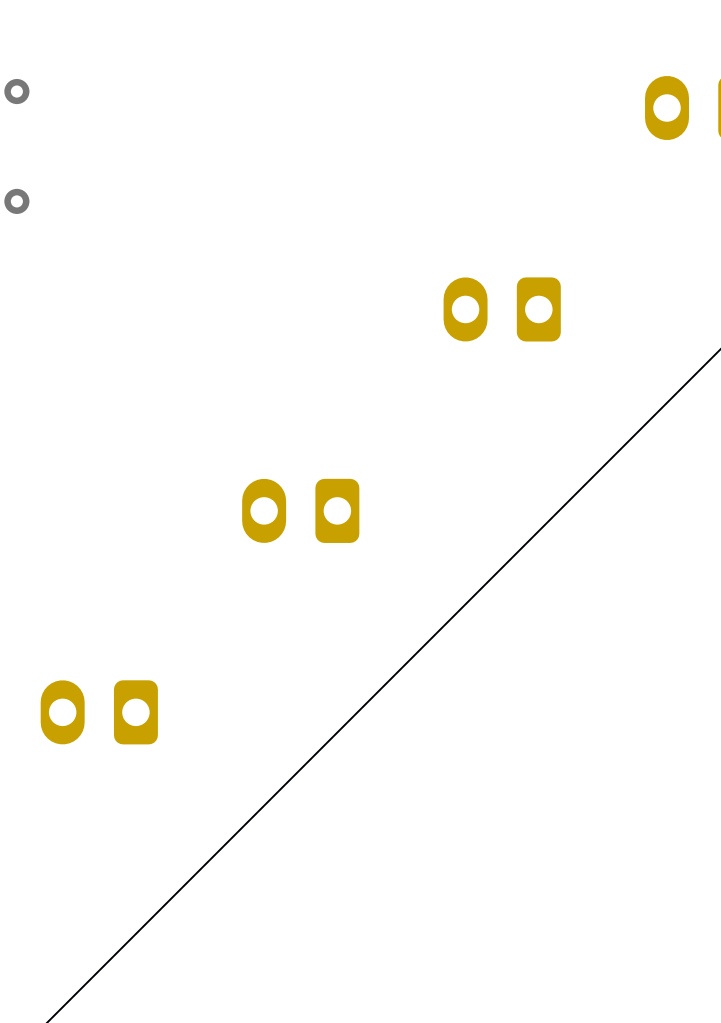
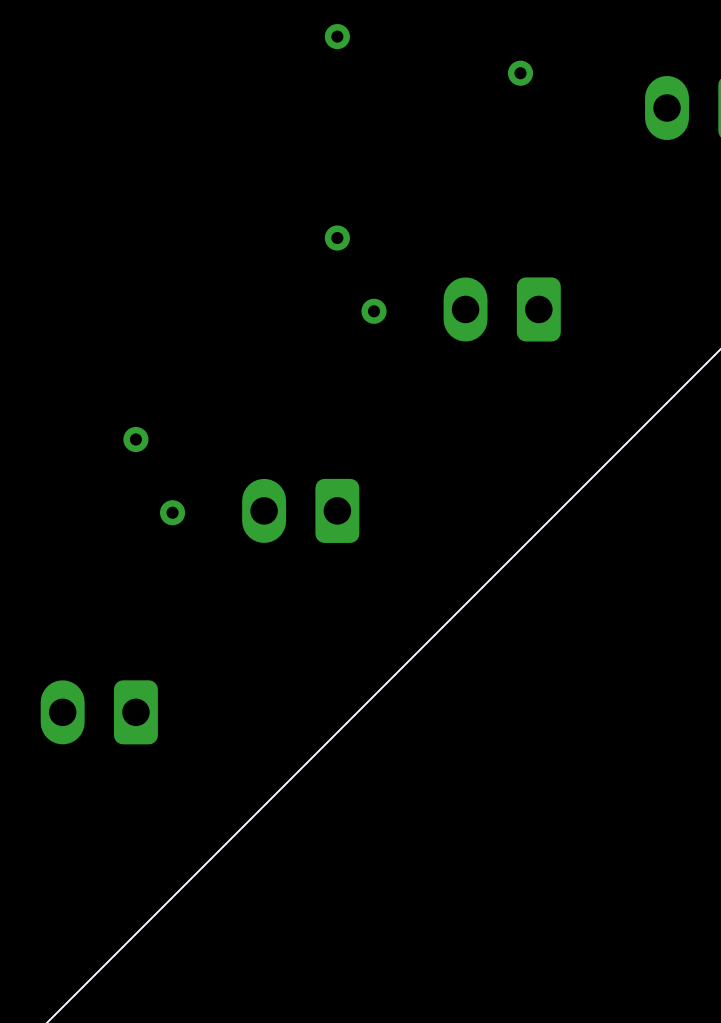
via: none -> (337, 36)
via: none -> (520, 73)
via: (16, 91) -> none
via: (16, 201) -> none
via: none -> (337, 238)
via: none -> (374, 311)
via: none -> (135, 439)
via: none -> (172, 512)

